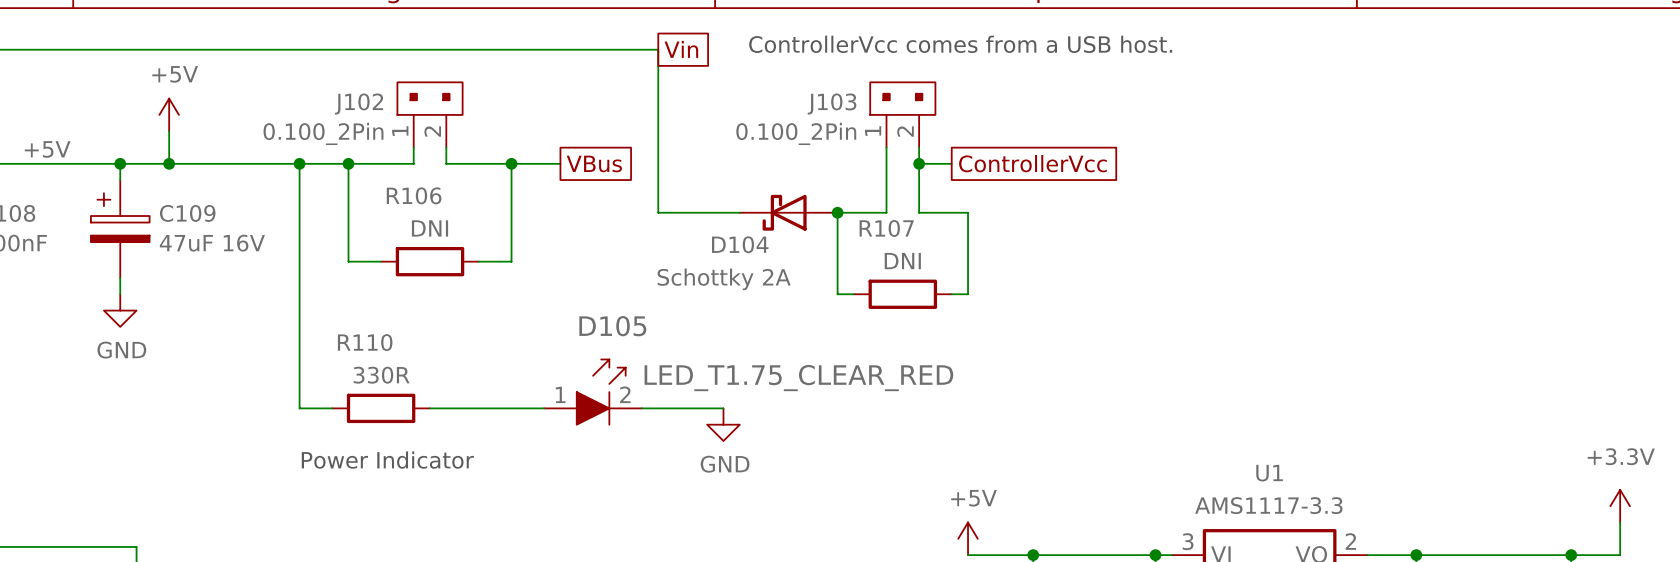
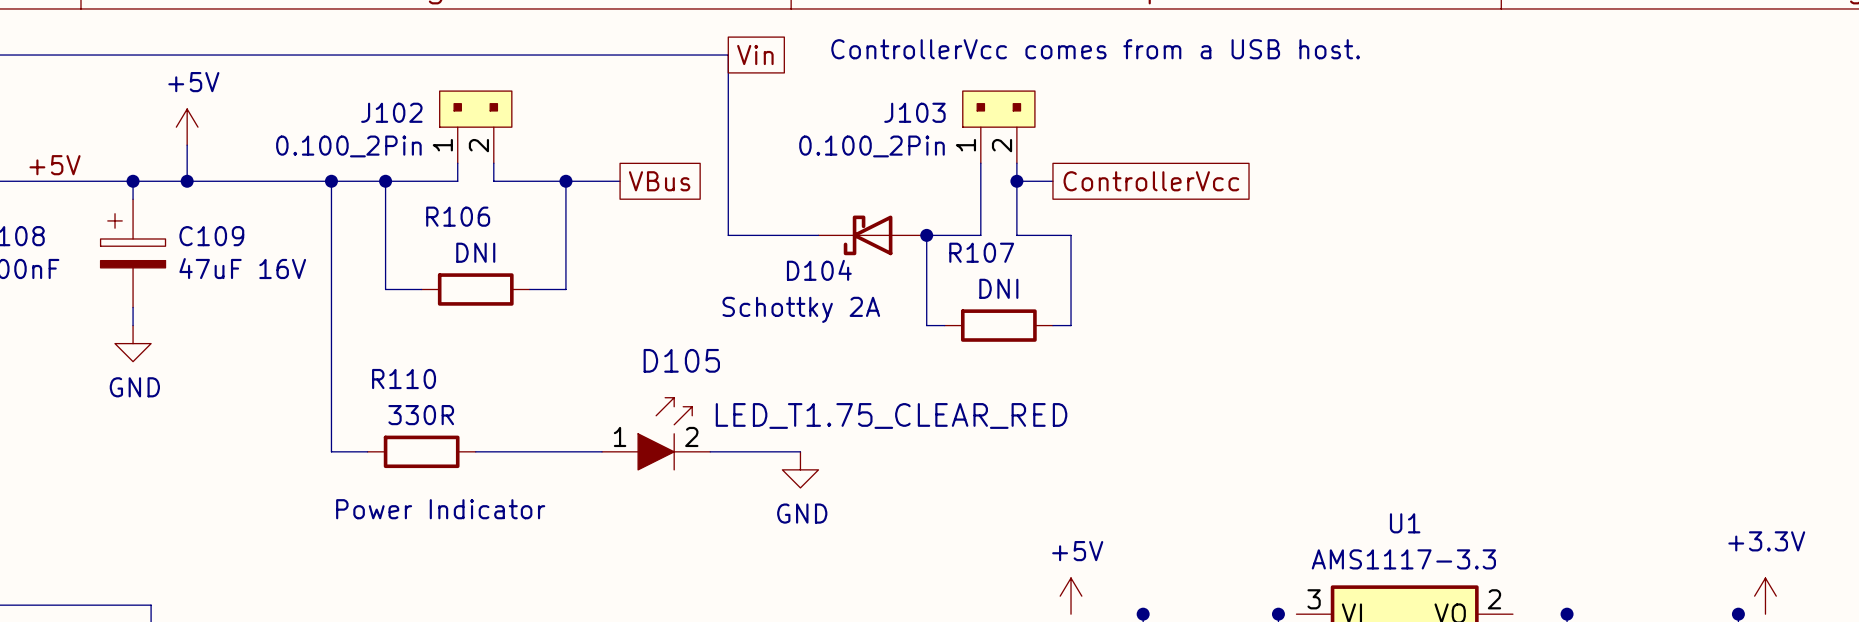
power symbol position: +3.3V (1620, 506) -> +3.3V (1765, 596)
wire: (1620, 522) (1620, 555) (1367, 555) -> none
wire: (968, 555) (1171, 555) -> none

